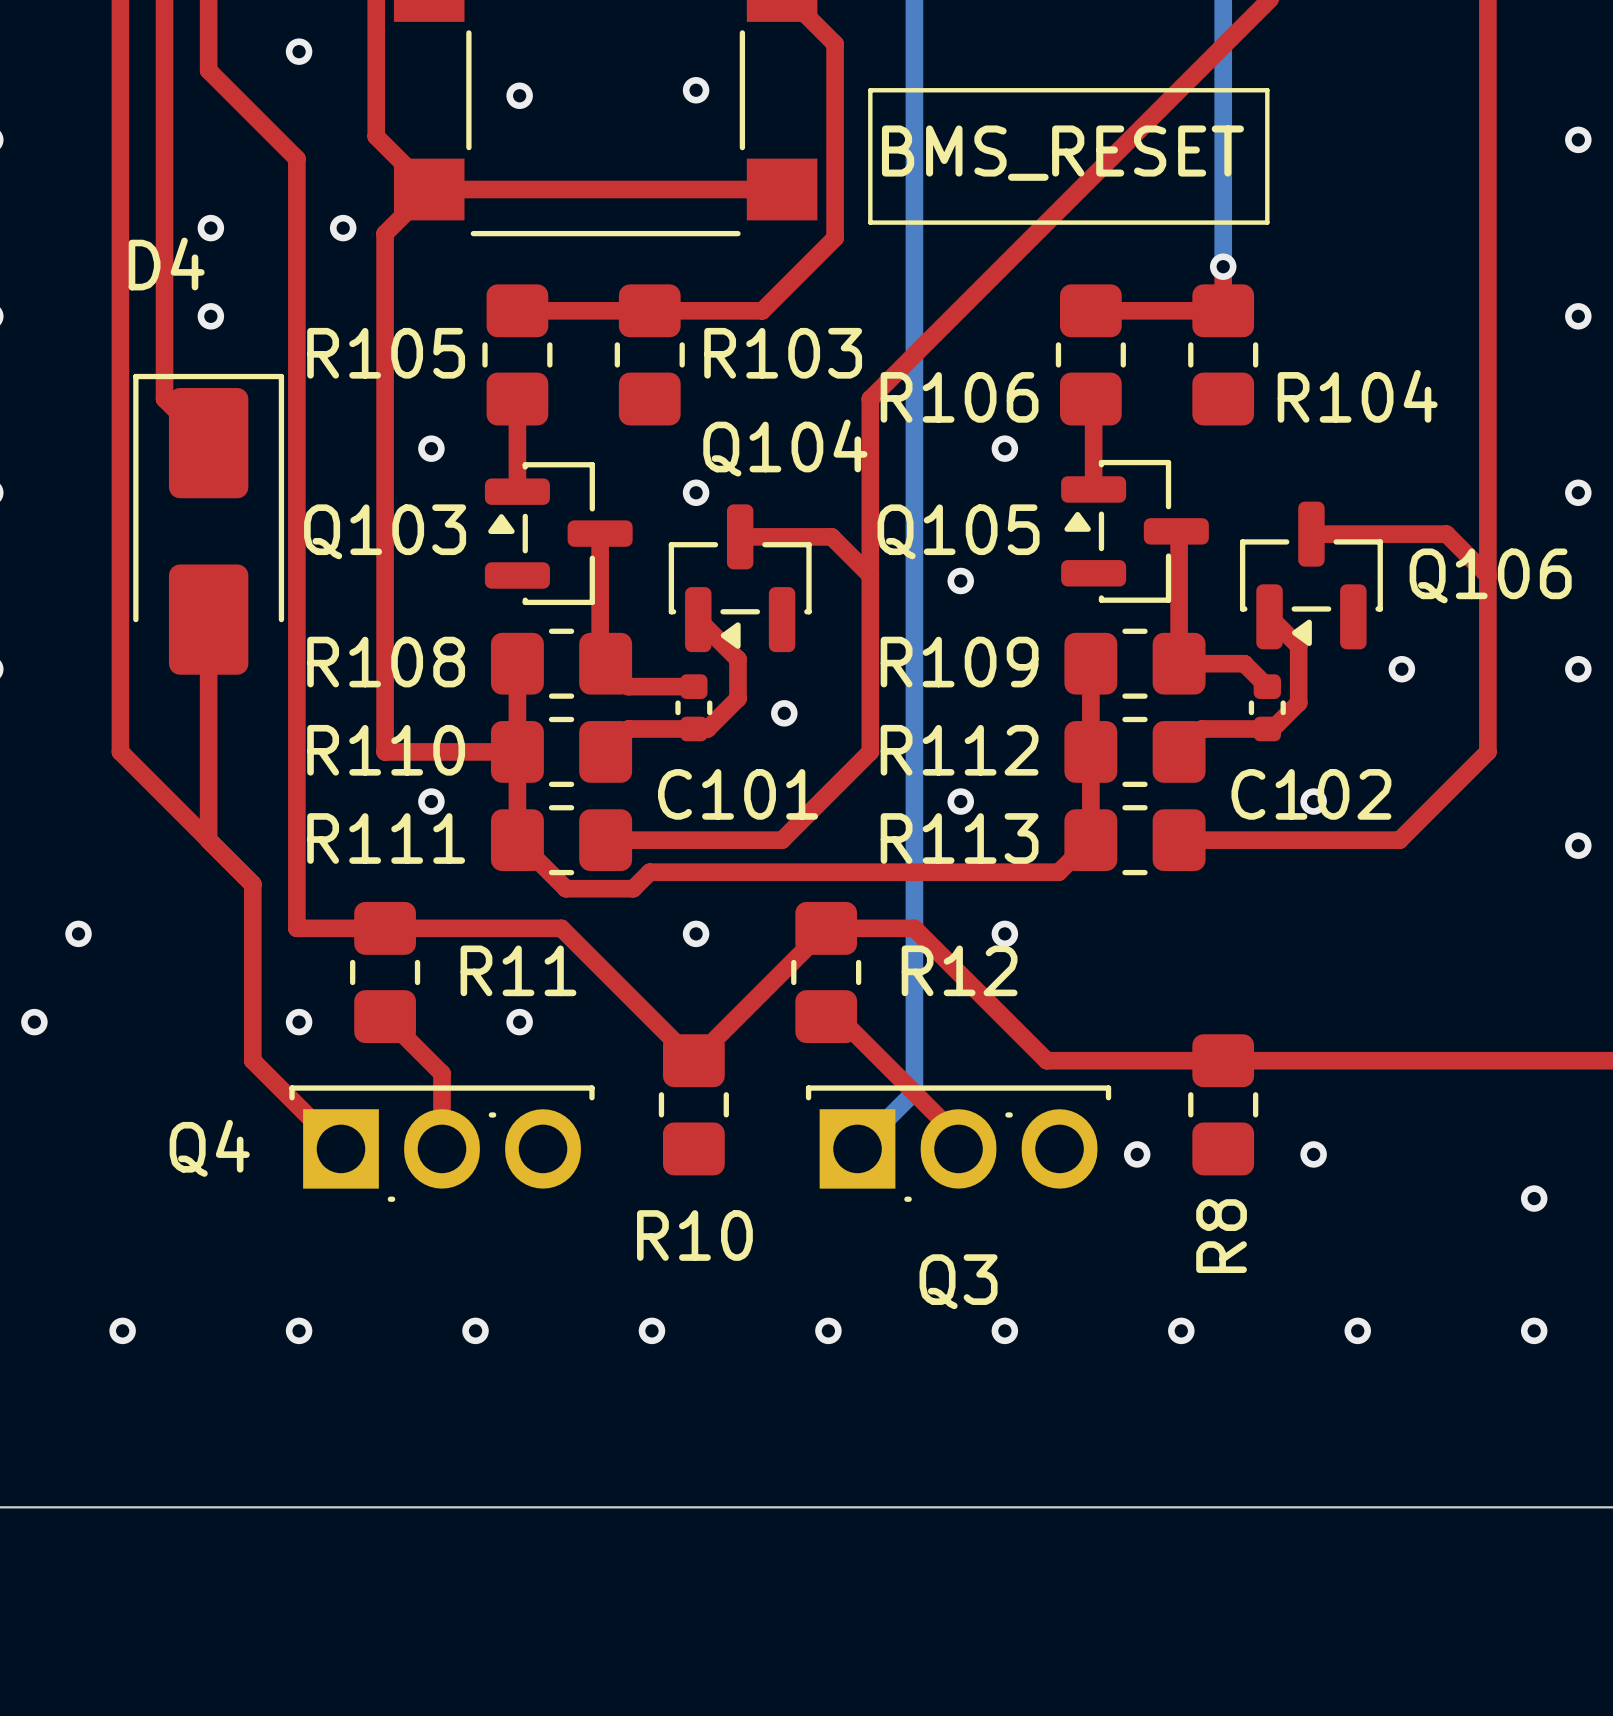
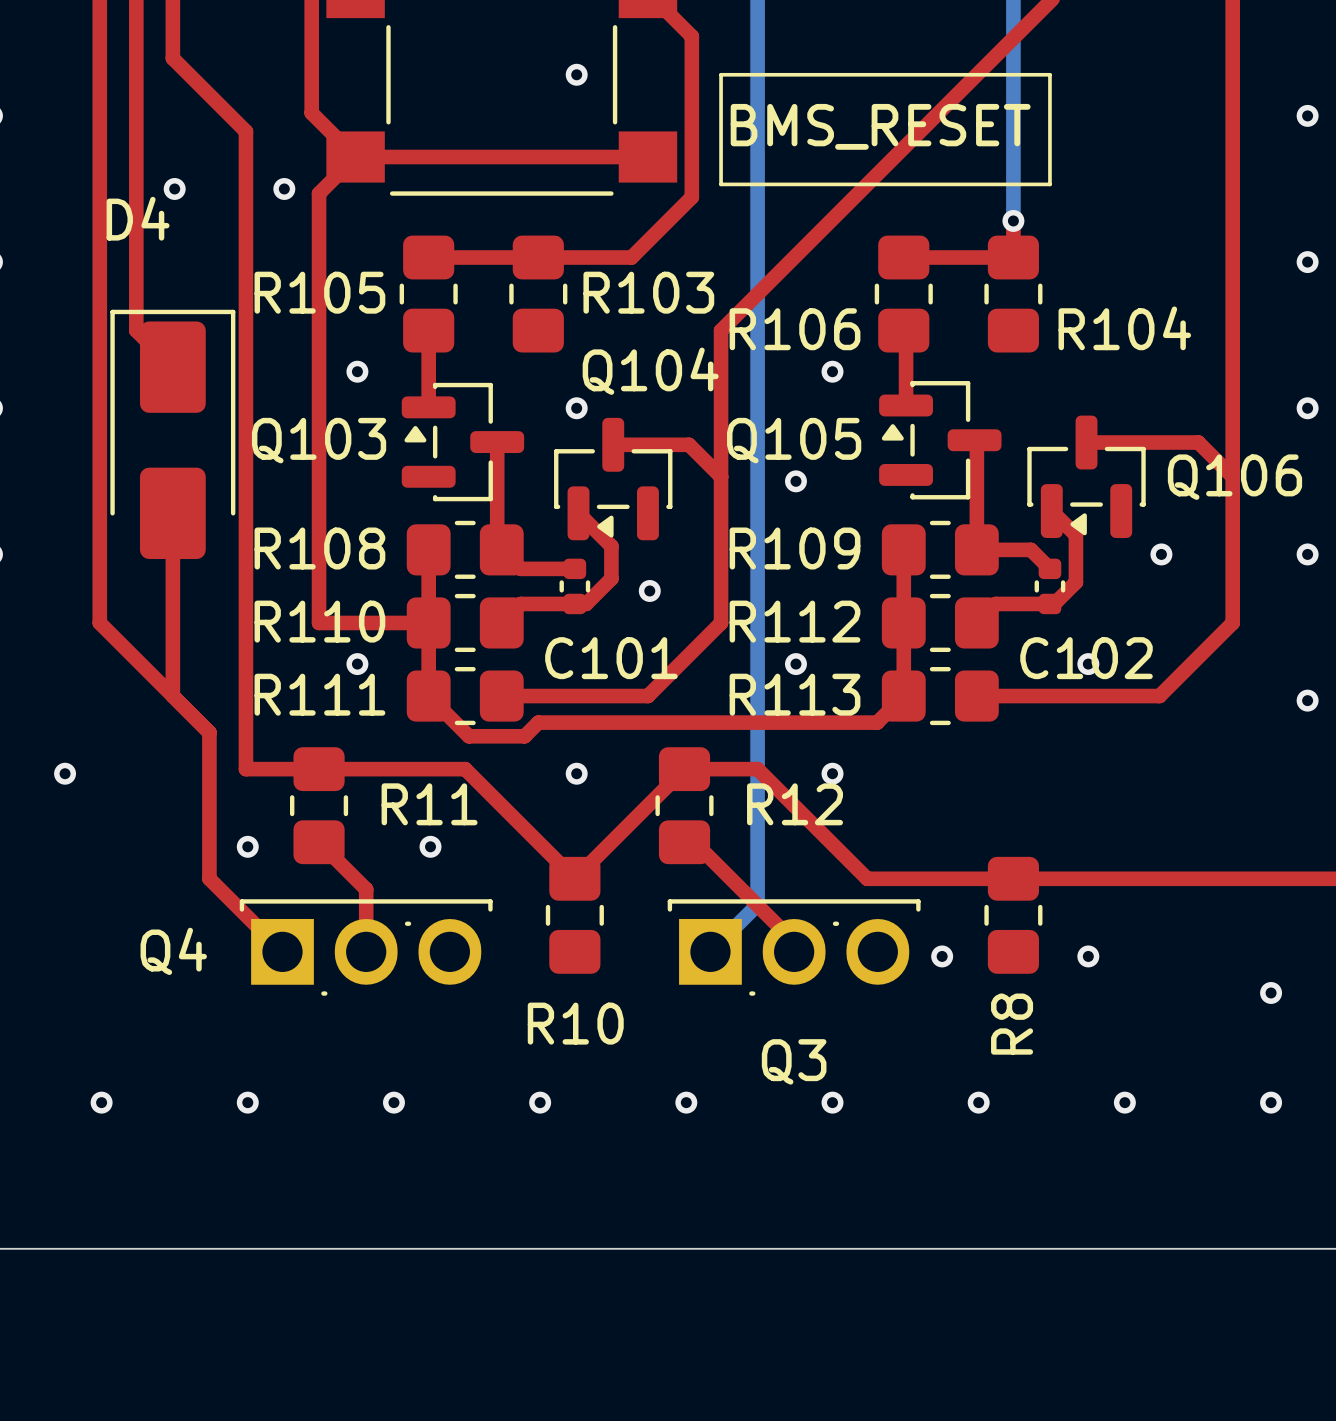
via: (299, 51) -> none
via: (519, 95) -> none
via: (210, 316) -> none
via: (34, 1022) -> none

